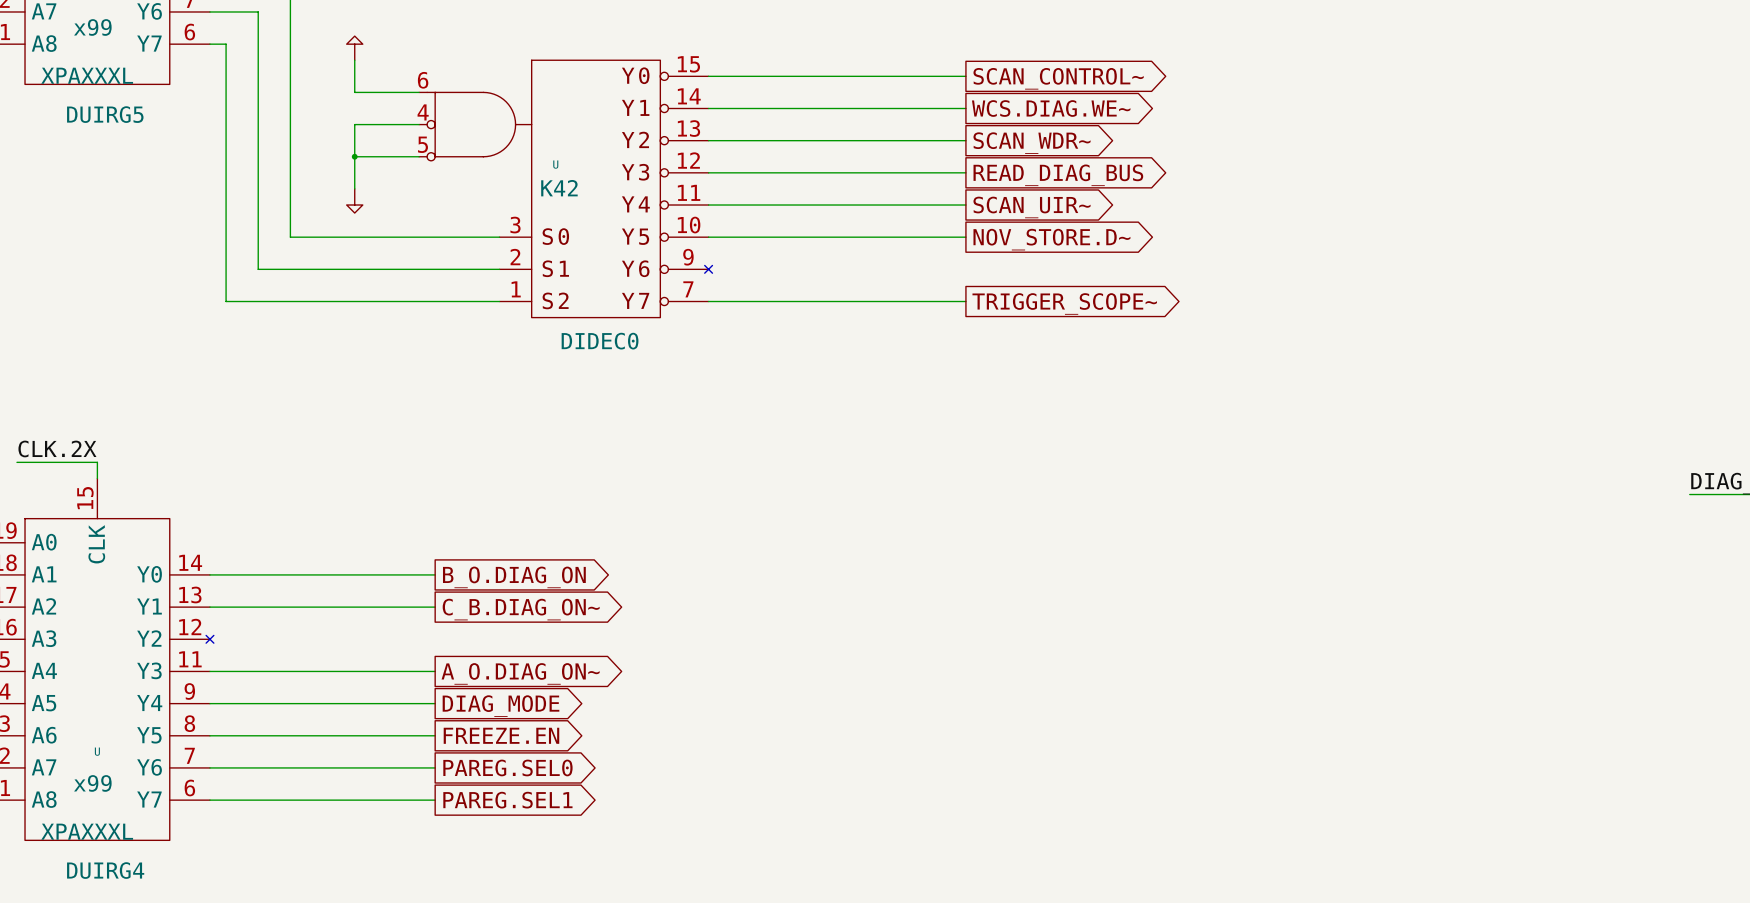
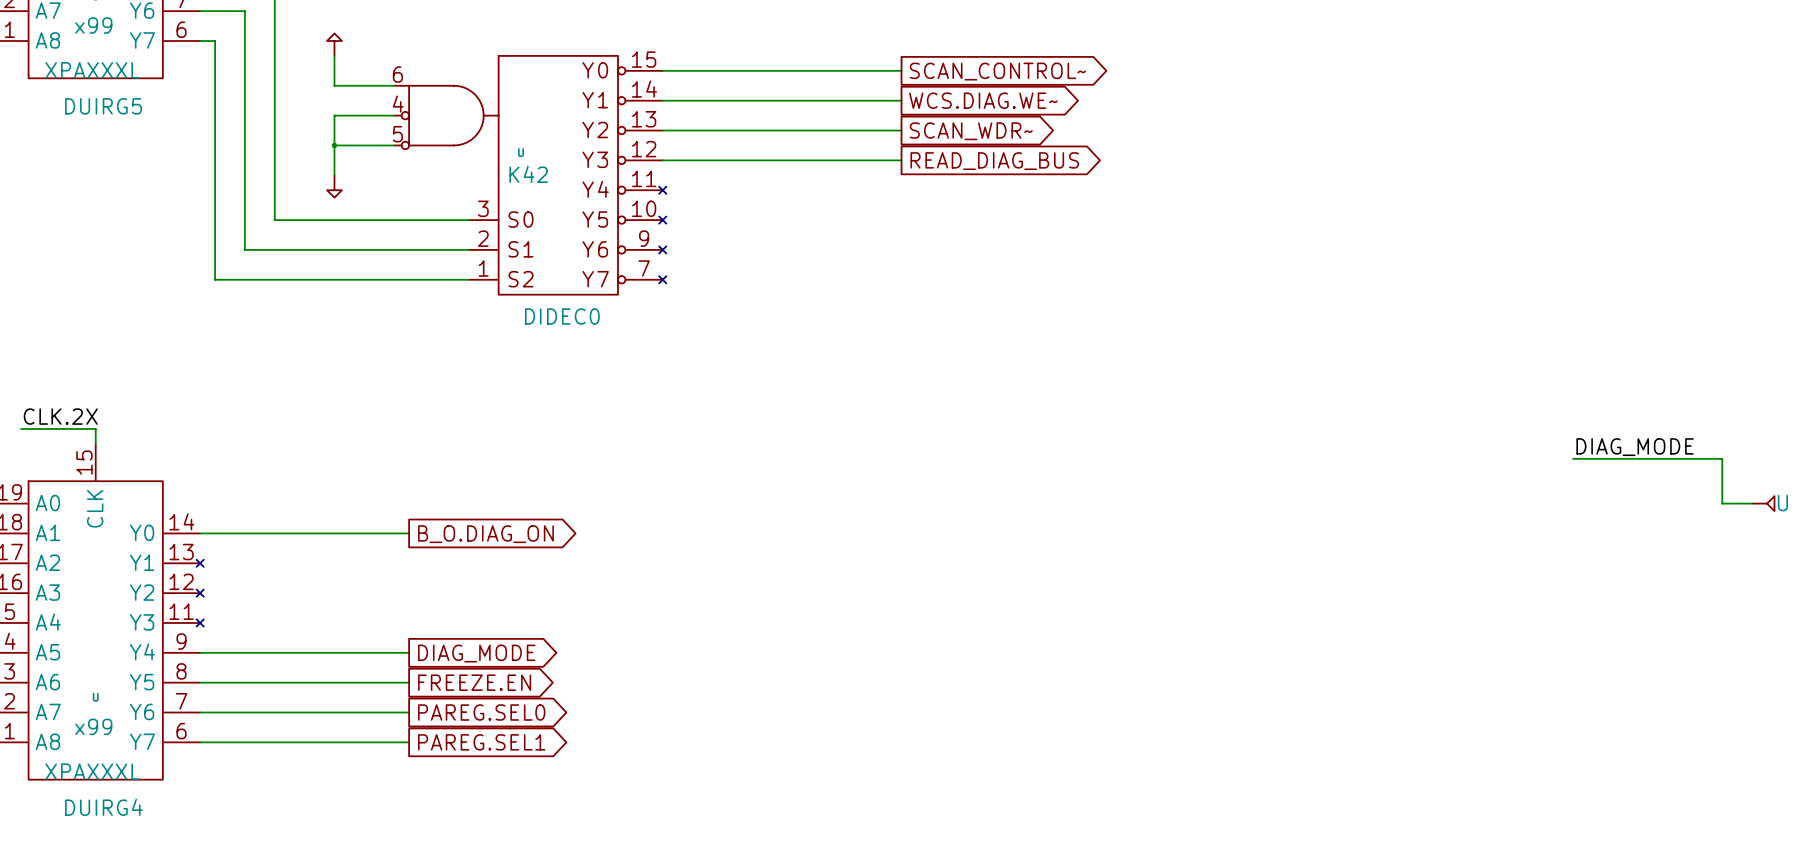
wire: (708, 205) (965, 205) -> none
no-connect mark: none -> (662, 190)
global label: SCAN_UIR~ (1032, 207) -> none
wire: (708, 237) (965, 237) -> none
no-connect mark: none -> (662, 220)
global label: NOV_STORE.D~ (1051, 239) -> none
wire: (708, 301) (965, 301) -> none
no-connect mark: none -> (662, 279)
global label: TRIGGER_SCOPE~ (1064, 303) -> none
wire: (209, 607) (435, 607) -> none
no-connect mark: none -> (200, 563)
global label: C_B.DIAG_ON~ (521, 609) -> none
wire: (209, 671) (435, 671) -> none
no-connect mark: none -> (200, 622)
global label: A_O.DIAG_ON~ (520, 673) -> none

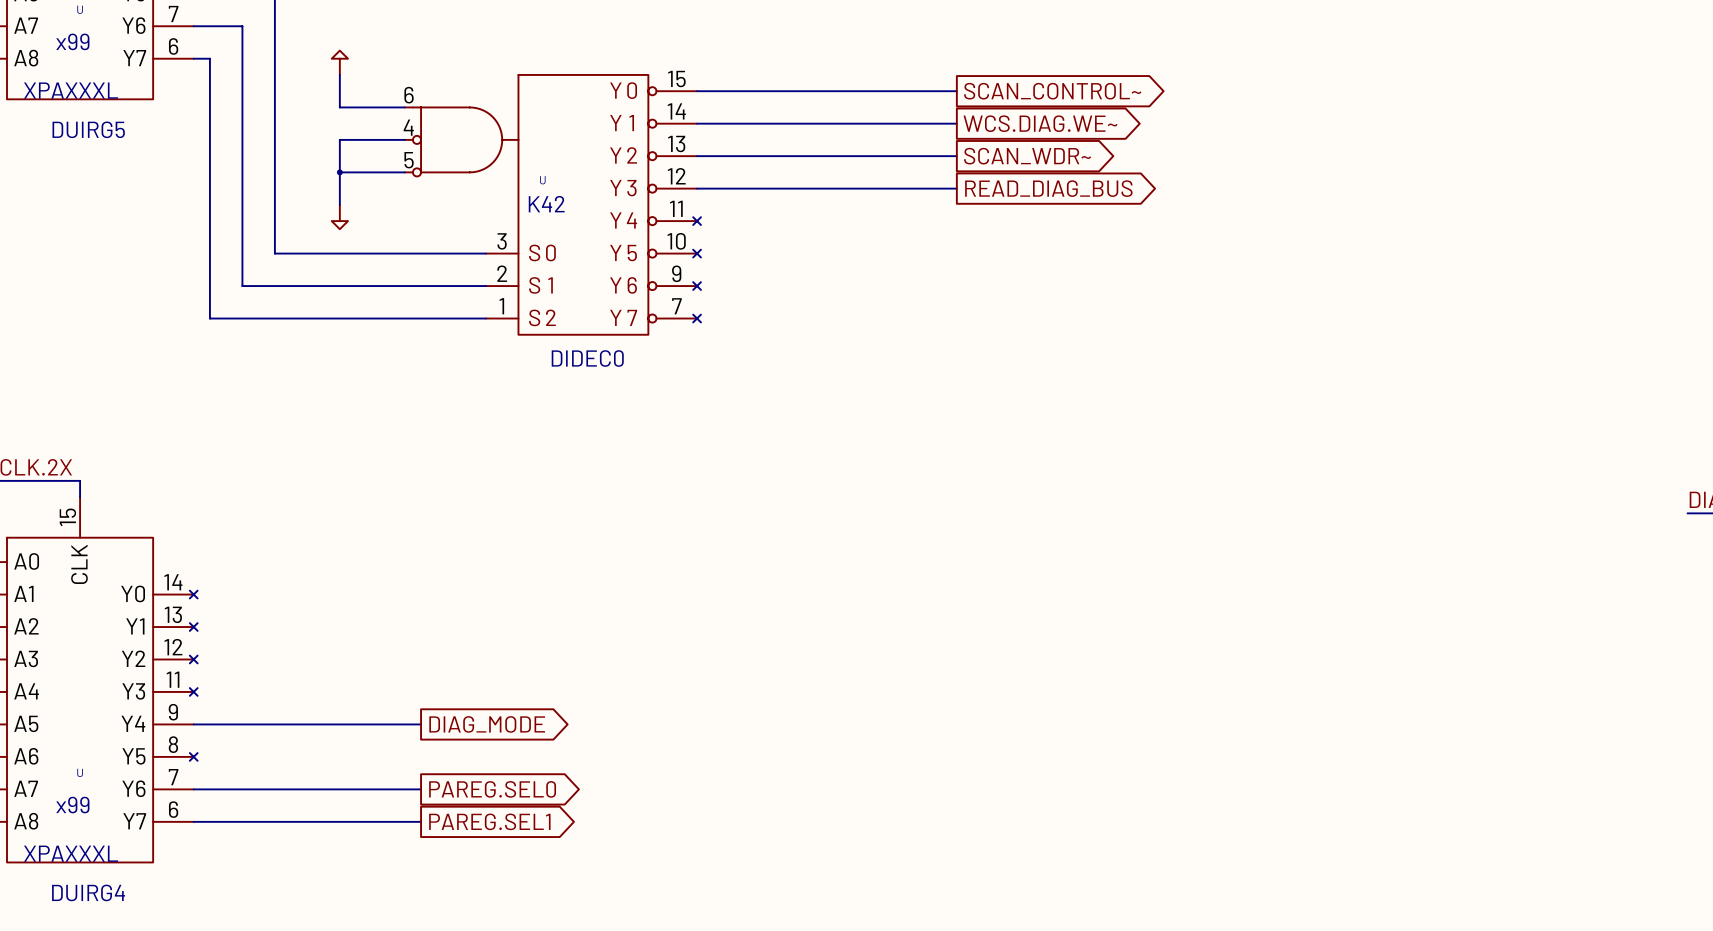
wire: (200, 533) (409, 533) -> none
no-connect mark: none -> (193, 594)
global label: B_O.DIAG_ON (485, 534) -> none
wire: (200, 682) (409, 682) -> none
no-connect mark: none -> (193, 756)
global label: FREEZE.EN (474, 682) -> none

